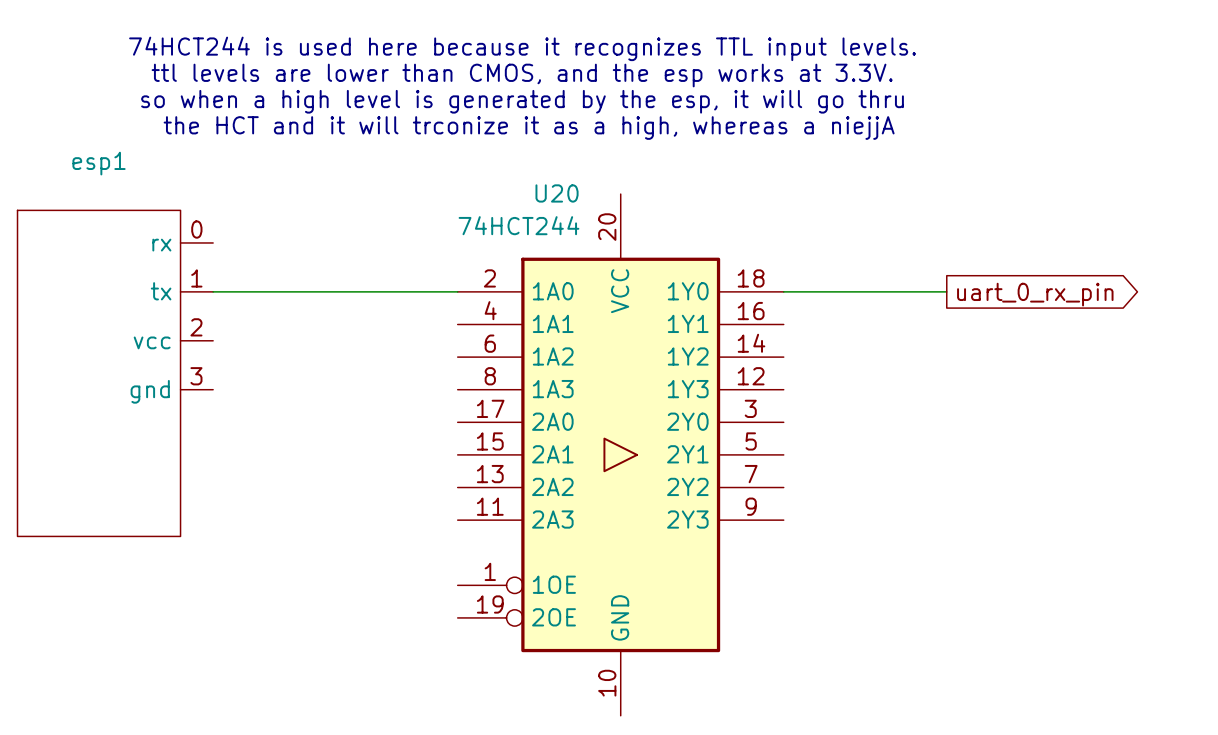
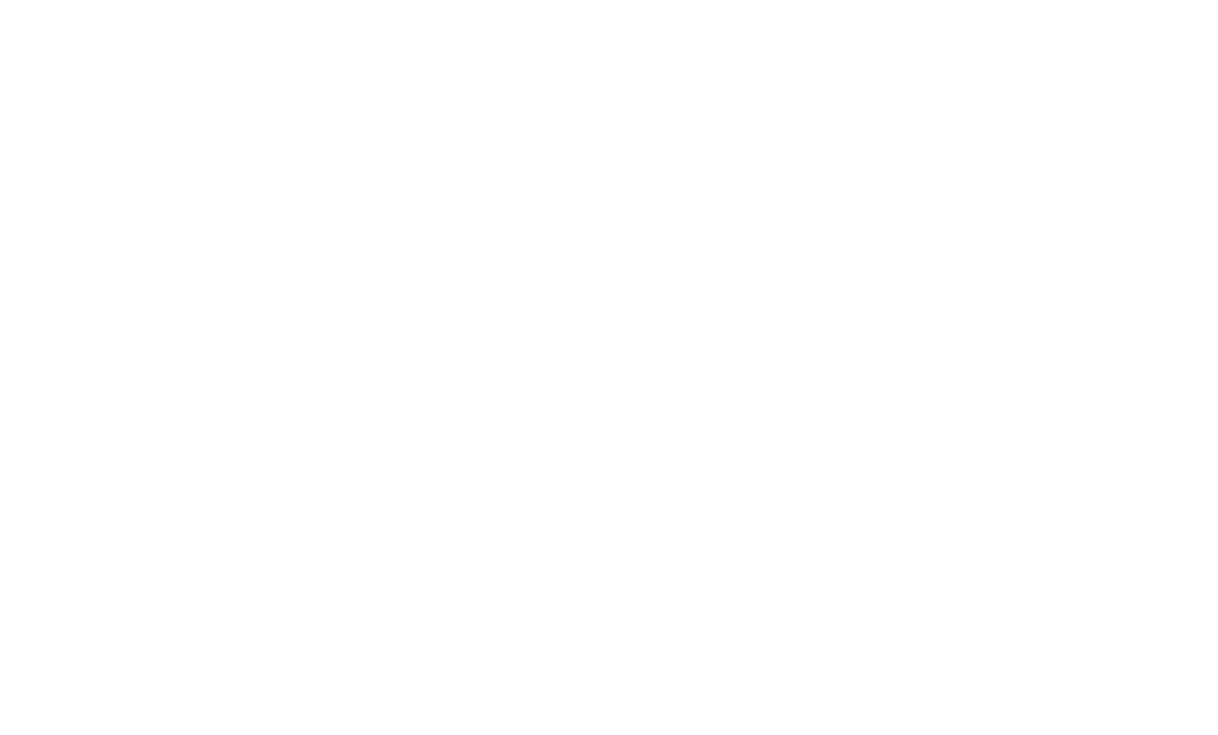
text: 74HCT244 is used here because it recognizes TTL input levels. (522, 48) -> none
text: ttl levels are lower than CMOS, and the esp works at 3.3V. (522, 75) -> none
text: so when a high level is generated by the esp, it will go thru (522, 101) -> none
text: the HCT and it will trconize it as a high, whereas a niejjA (529, 128) -> none
wire: (213, 291) (457, 291) -> none
wire: (783, 291) (946, 291) -> none
global label: uart_0_rx_pin (1035, 294) -> none
esp1: (115, 373) -> none
U20: 74HCT244 (620, 454) -> none

